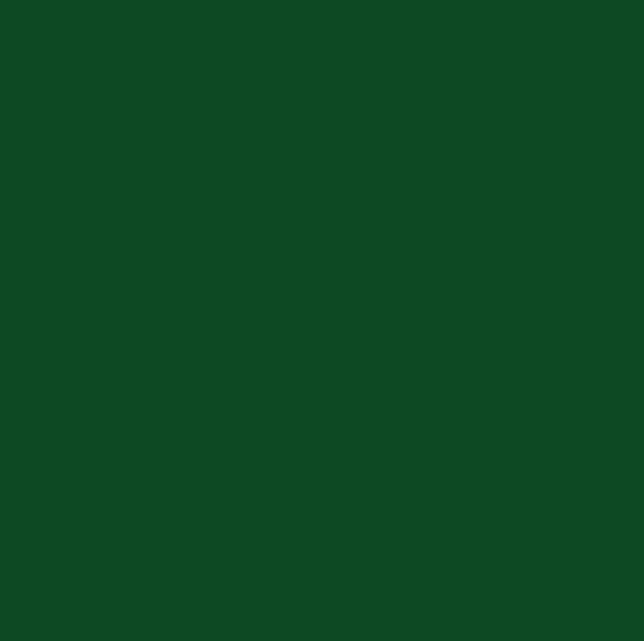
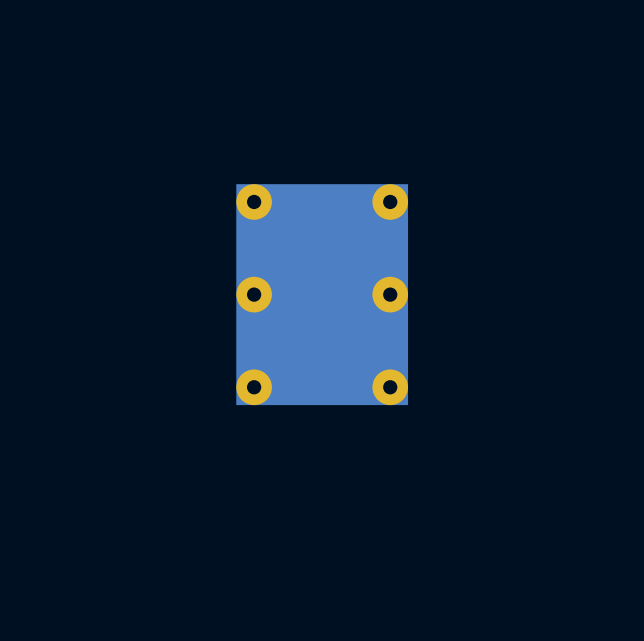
part: none -> (322, 294)

